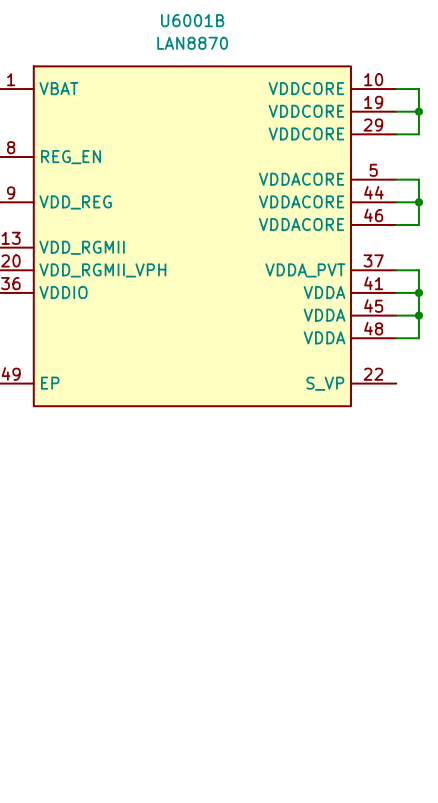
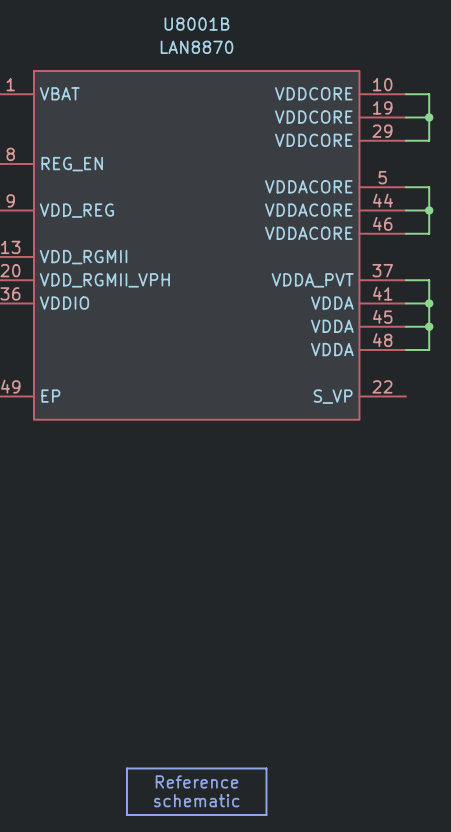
U6001B name: U6001B (192, 20) -> U8001B (196, 24)
line: none -> (126, 768) (266, 768) (266, 814) (126, 814) (126, 768)
text: none -> Reference (196, 781)
text: none -> schematic (196, 800)

